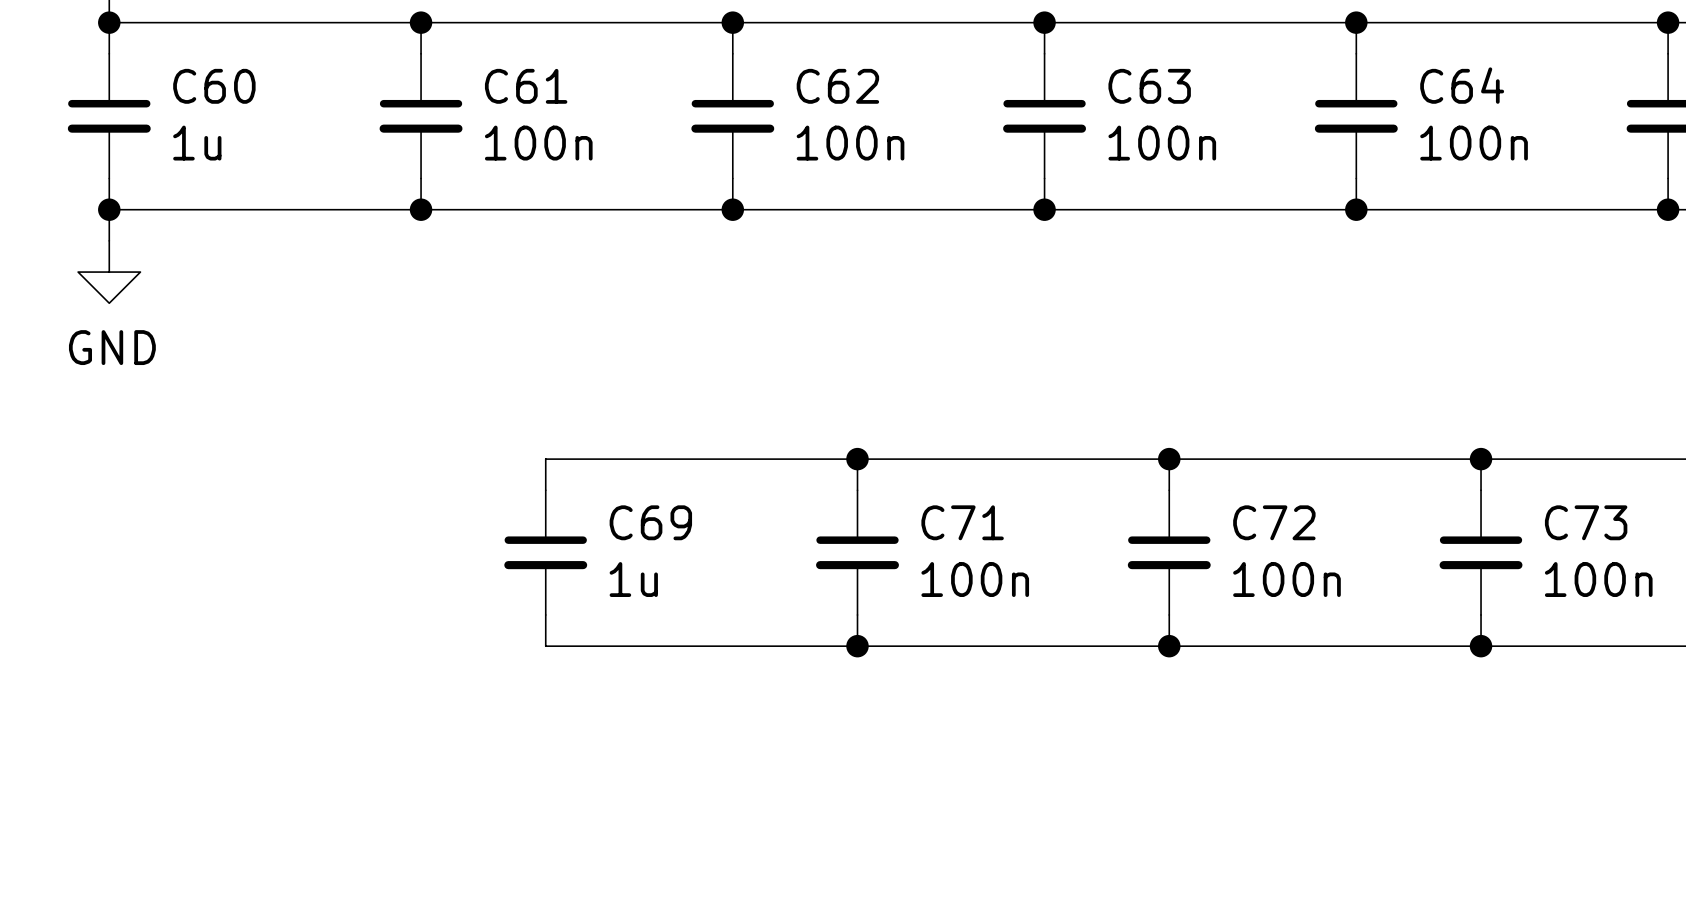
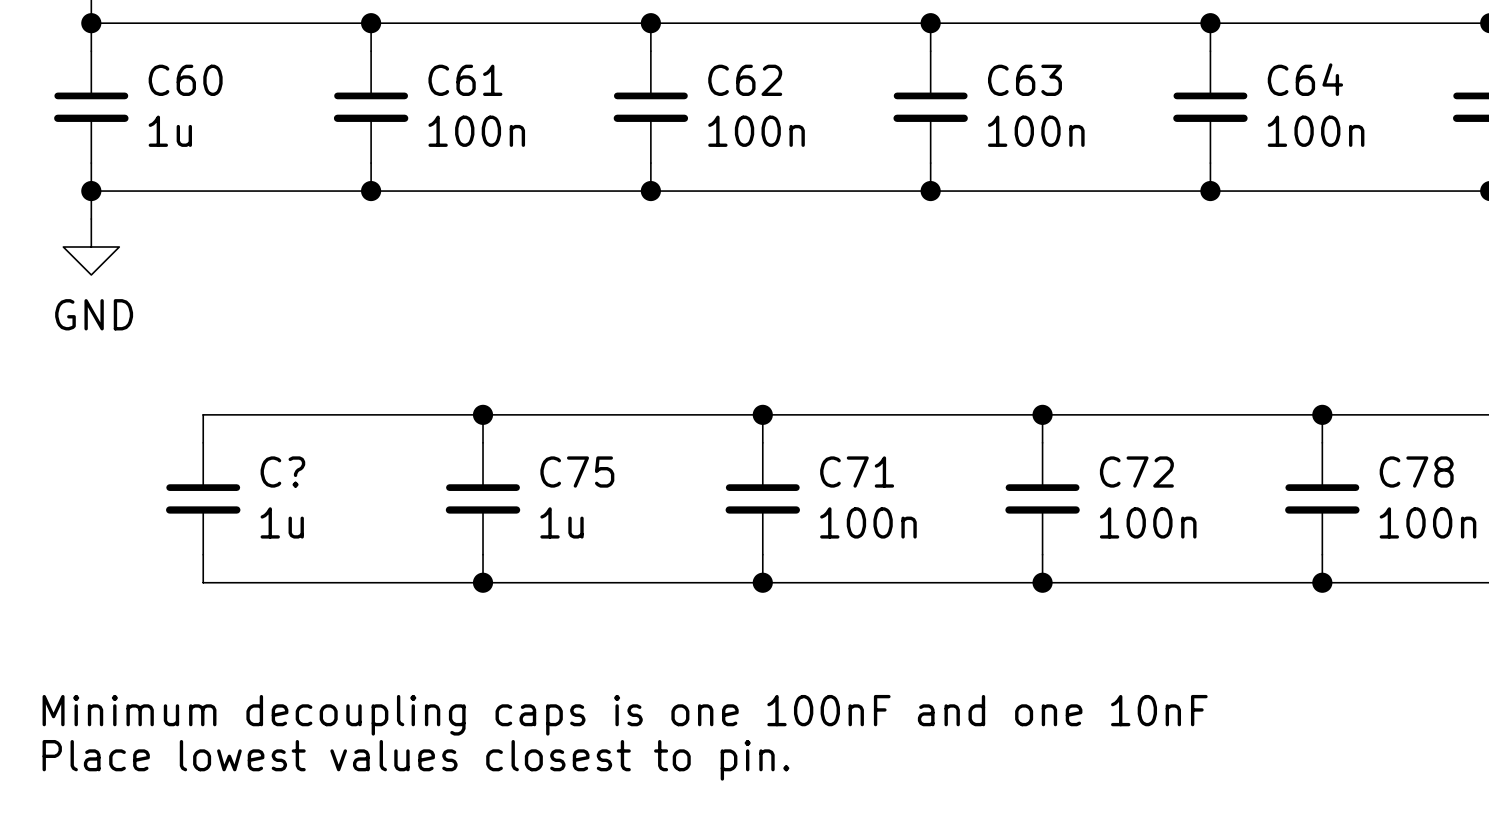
wire: none -> (483, 414) (203, 414) (203, 442)
junction: none -> (483, 414)
C69 name: C69 (650, 522) -> C75 (577, 472)
C73 name: C73 (1586, 522) -> C78 (1416, 472)
C?: none -> 1u (203, 498)
wire: none -> (203, 554) (203, 582) (483, 582)
junction: none -> (483, 582)
text: none -> Minimum decoupling caps is one 100nF and one 10nF (625, 715)
text: none -> Place lowest values closest to pin. (415, 760)

